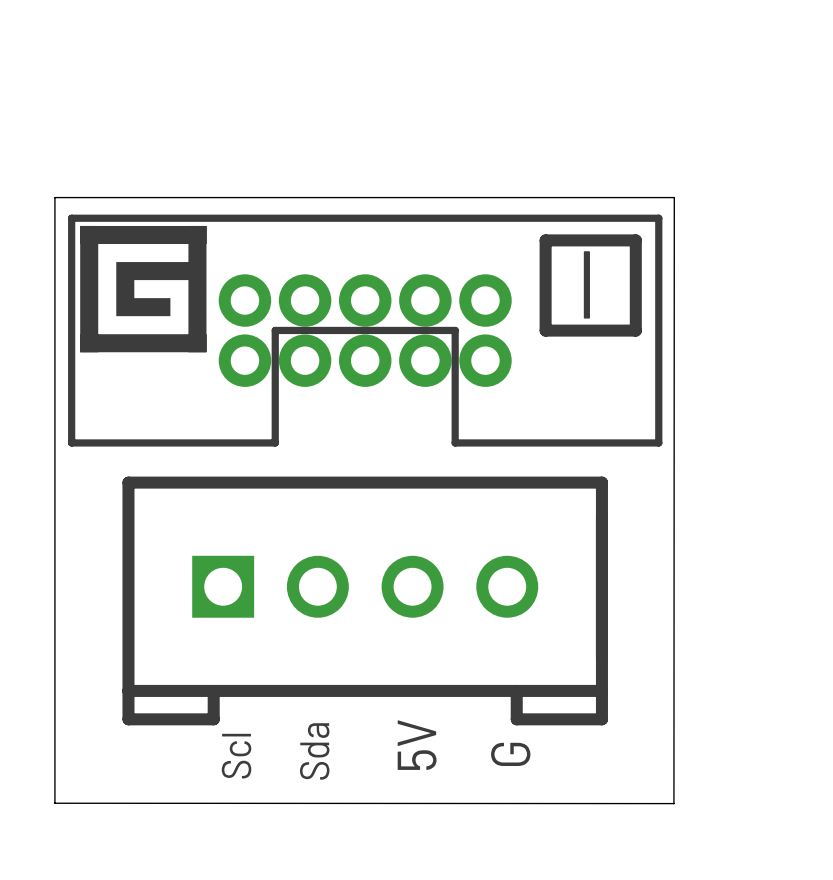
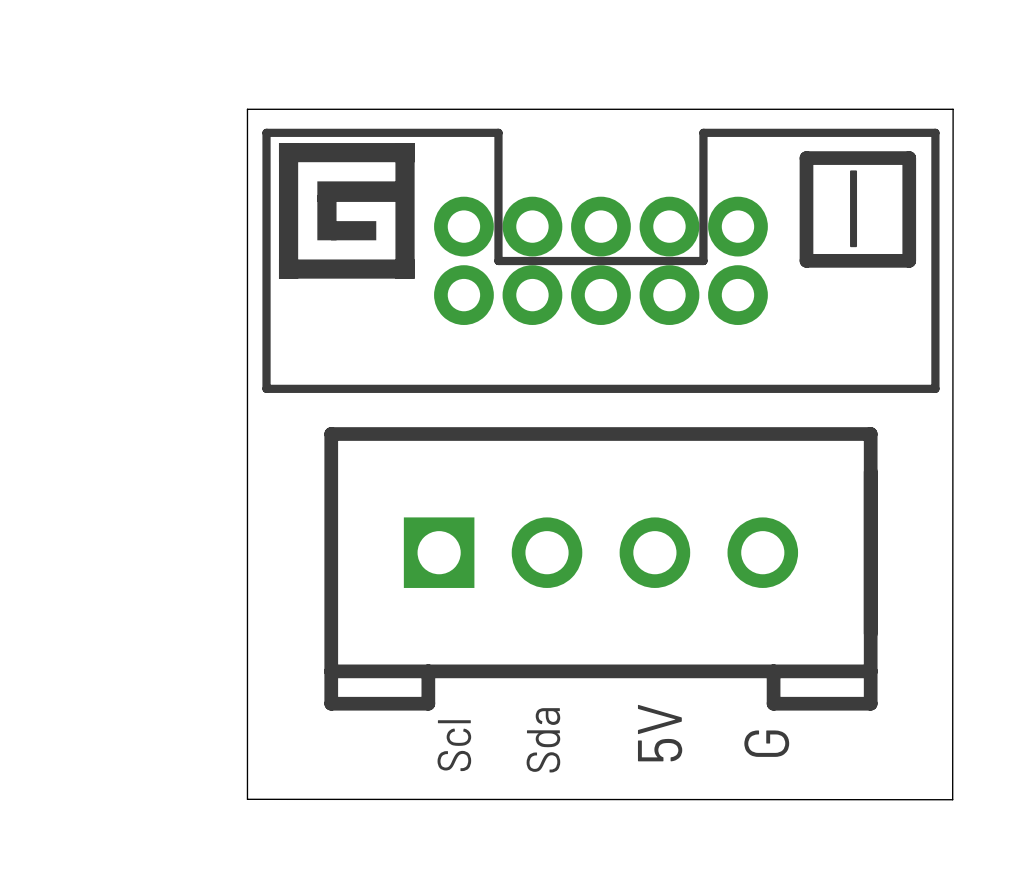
drawing: [80, 225, 207, 353] -> none
drawing: none -> [278, 143, 415, 279]
part rotation: 0° (365, 330) -> 180° (600, 260)

